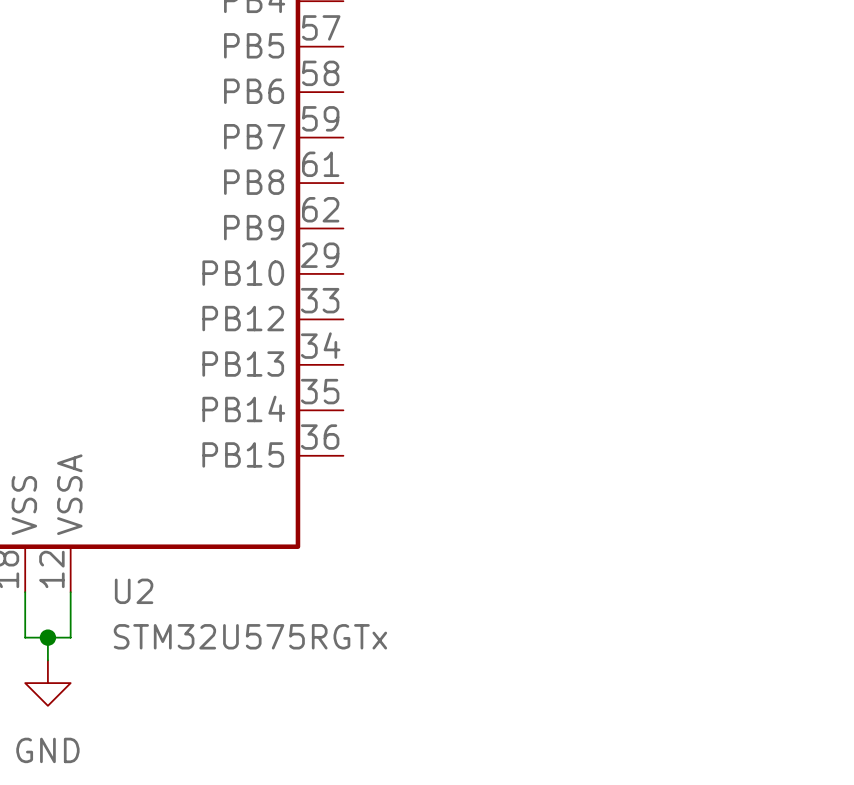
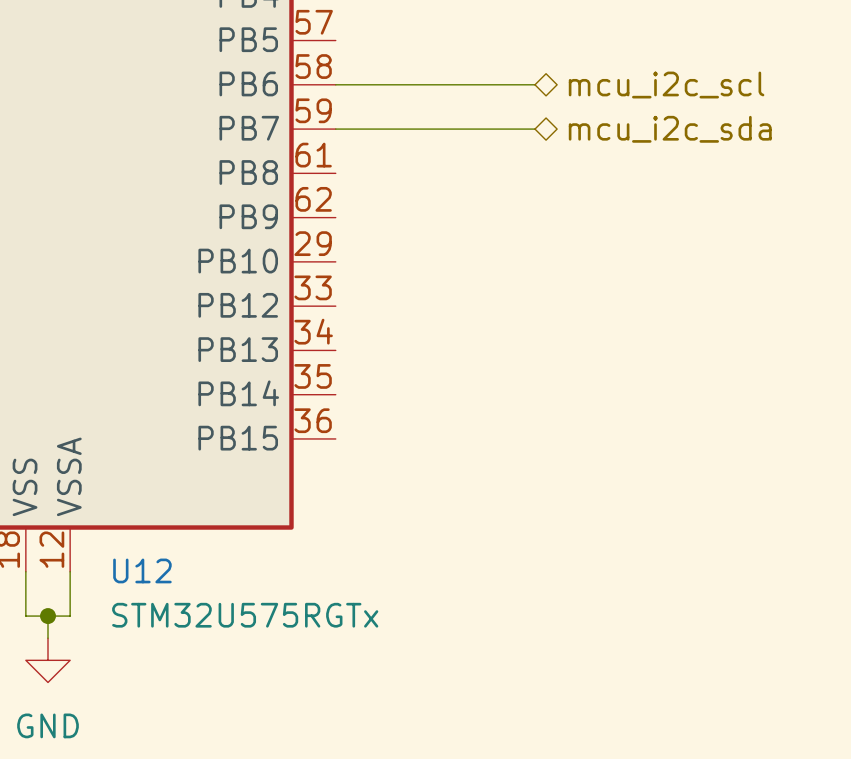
wire: none -> (335, 84) (534, 84)
hierarchical label: none -> mcu_i2c_scl (666, 85)
wire: none -> (335, 129) (534, 129)
hierarchical label: none -> mcu_i2c_sda (670, 129)
U2 name: U2 (134, 591) -> U12 (142, 570)

